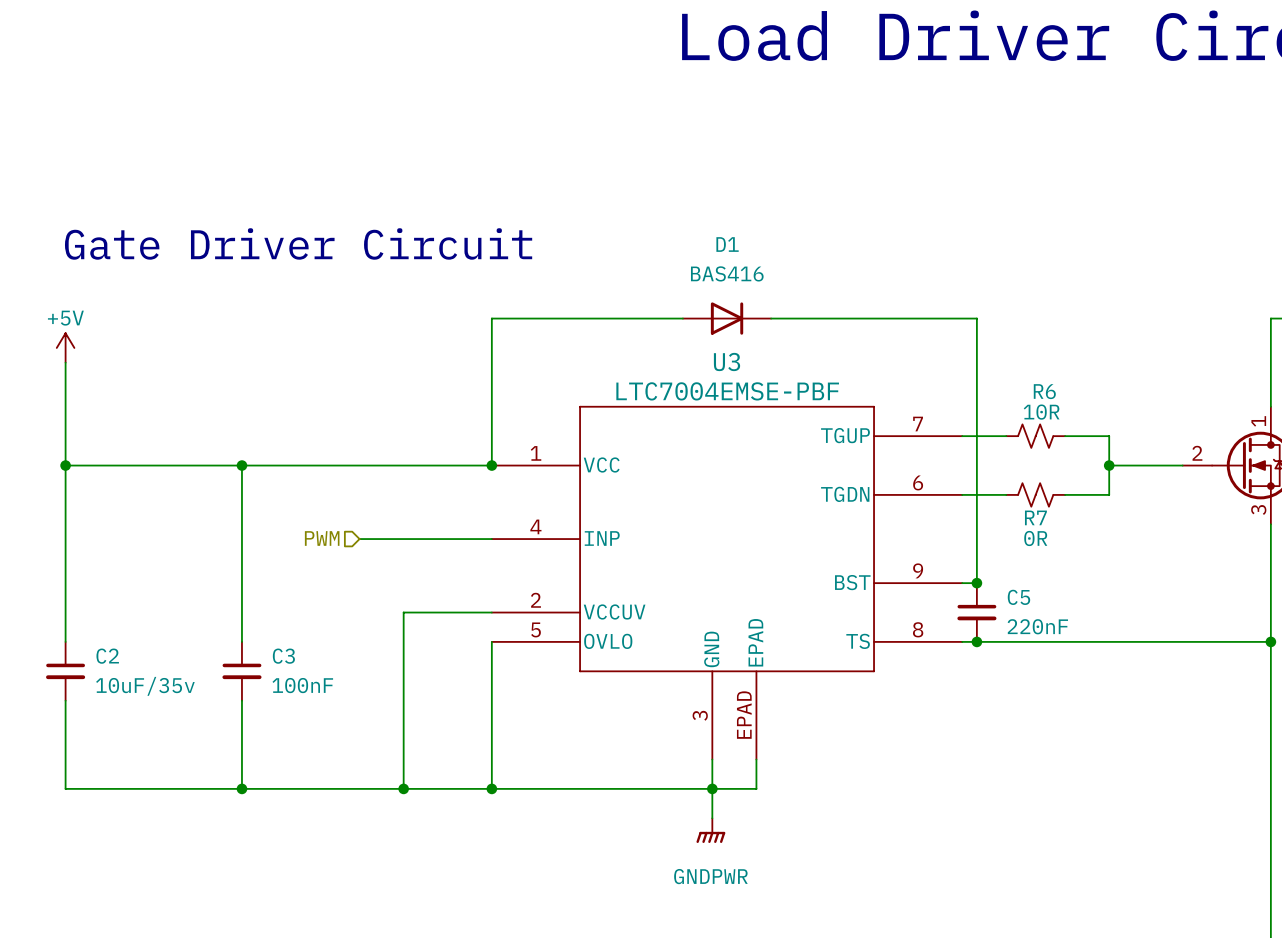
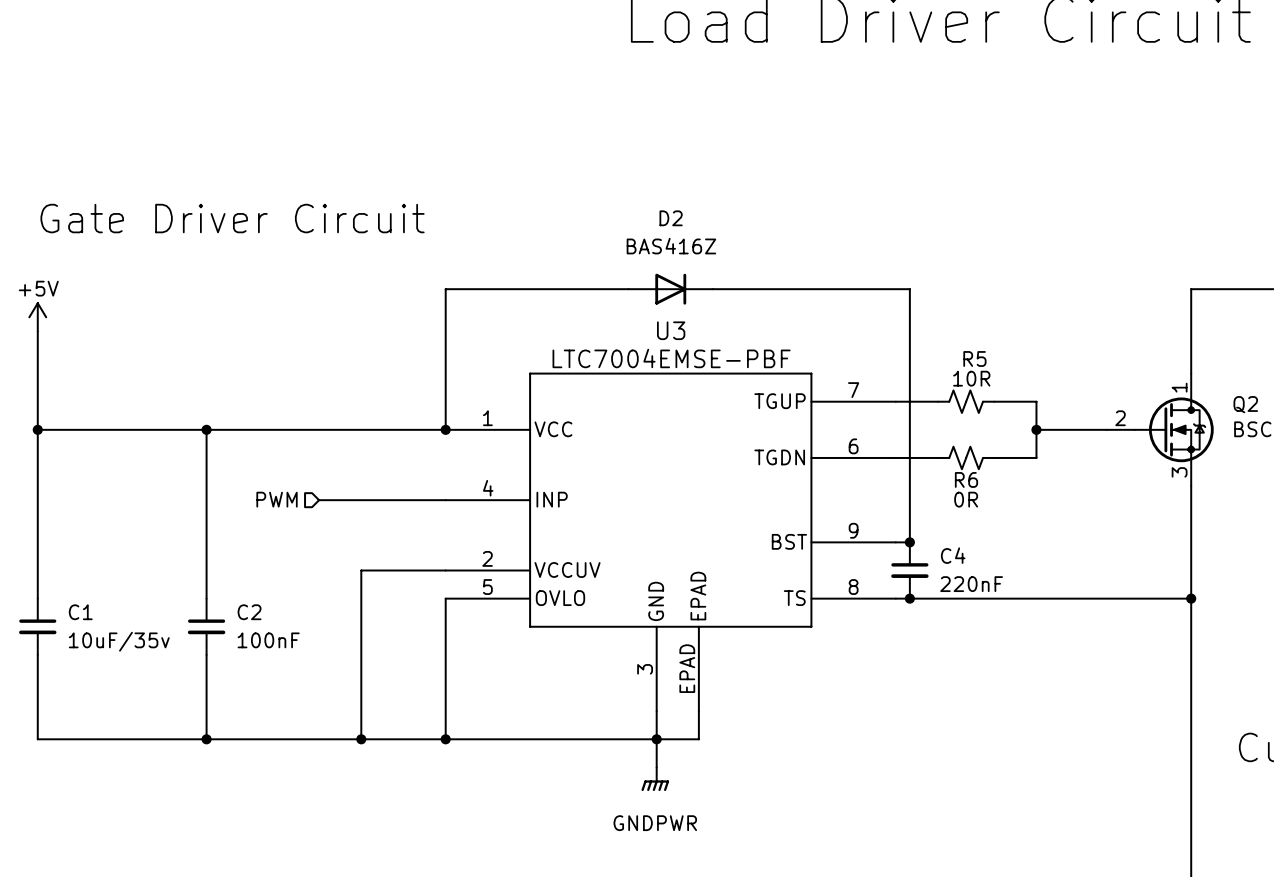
D1 name: D1 (727, 244) -> D2 (671, 218)
D1 value: BAS416 (727, 273) -> BAS416Z (671, 246)
R6 name: R6 (1044, 391) -> R5 (974, 358)
R7 name: R7 (1035, 517) -> R6 (966, 479)
C5 name: C5 (1018, 597) -> C4 (953, 555)
C2 name: C2 (107, 656) -> C1 (80, 612)
C3 name: C3 (283, 656) -> C2 (249, 612)

